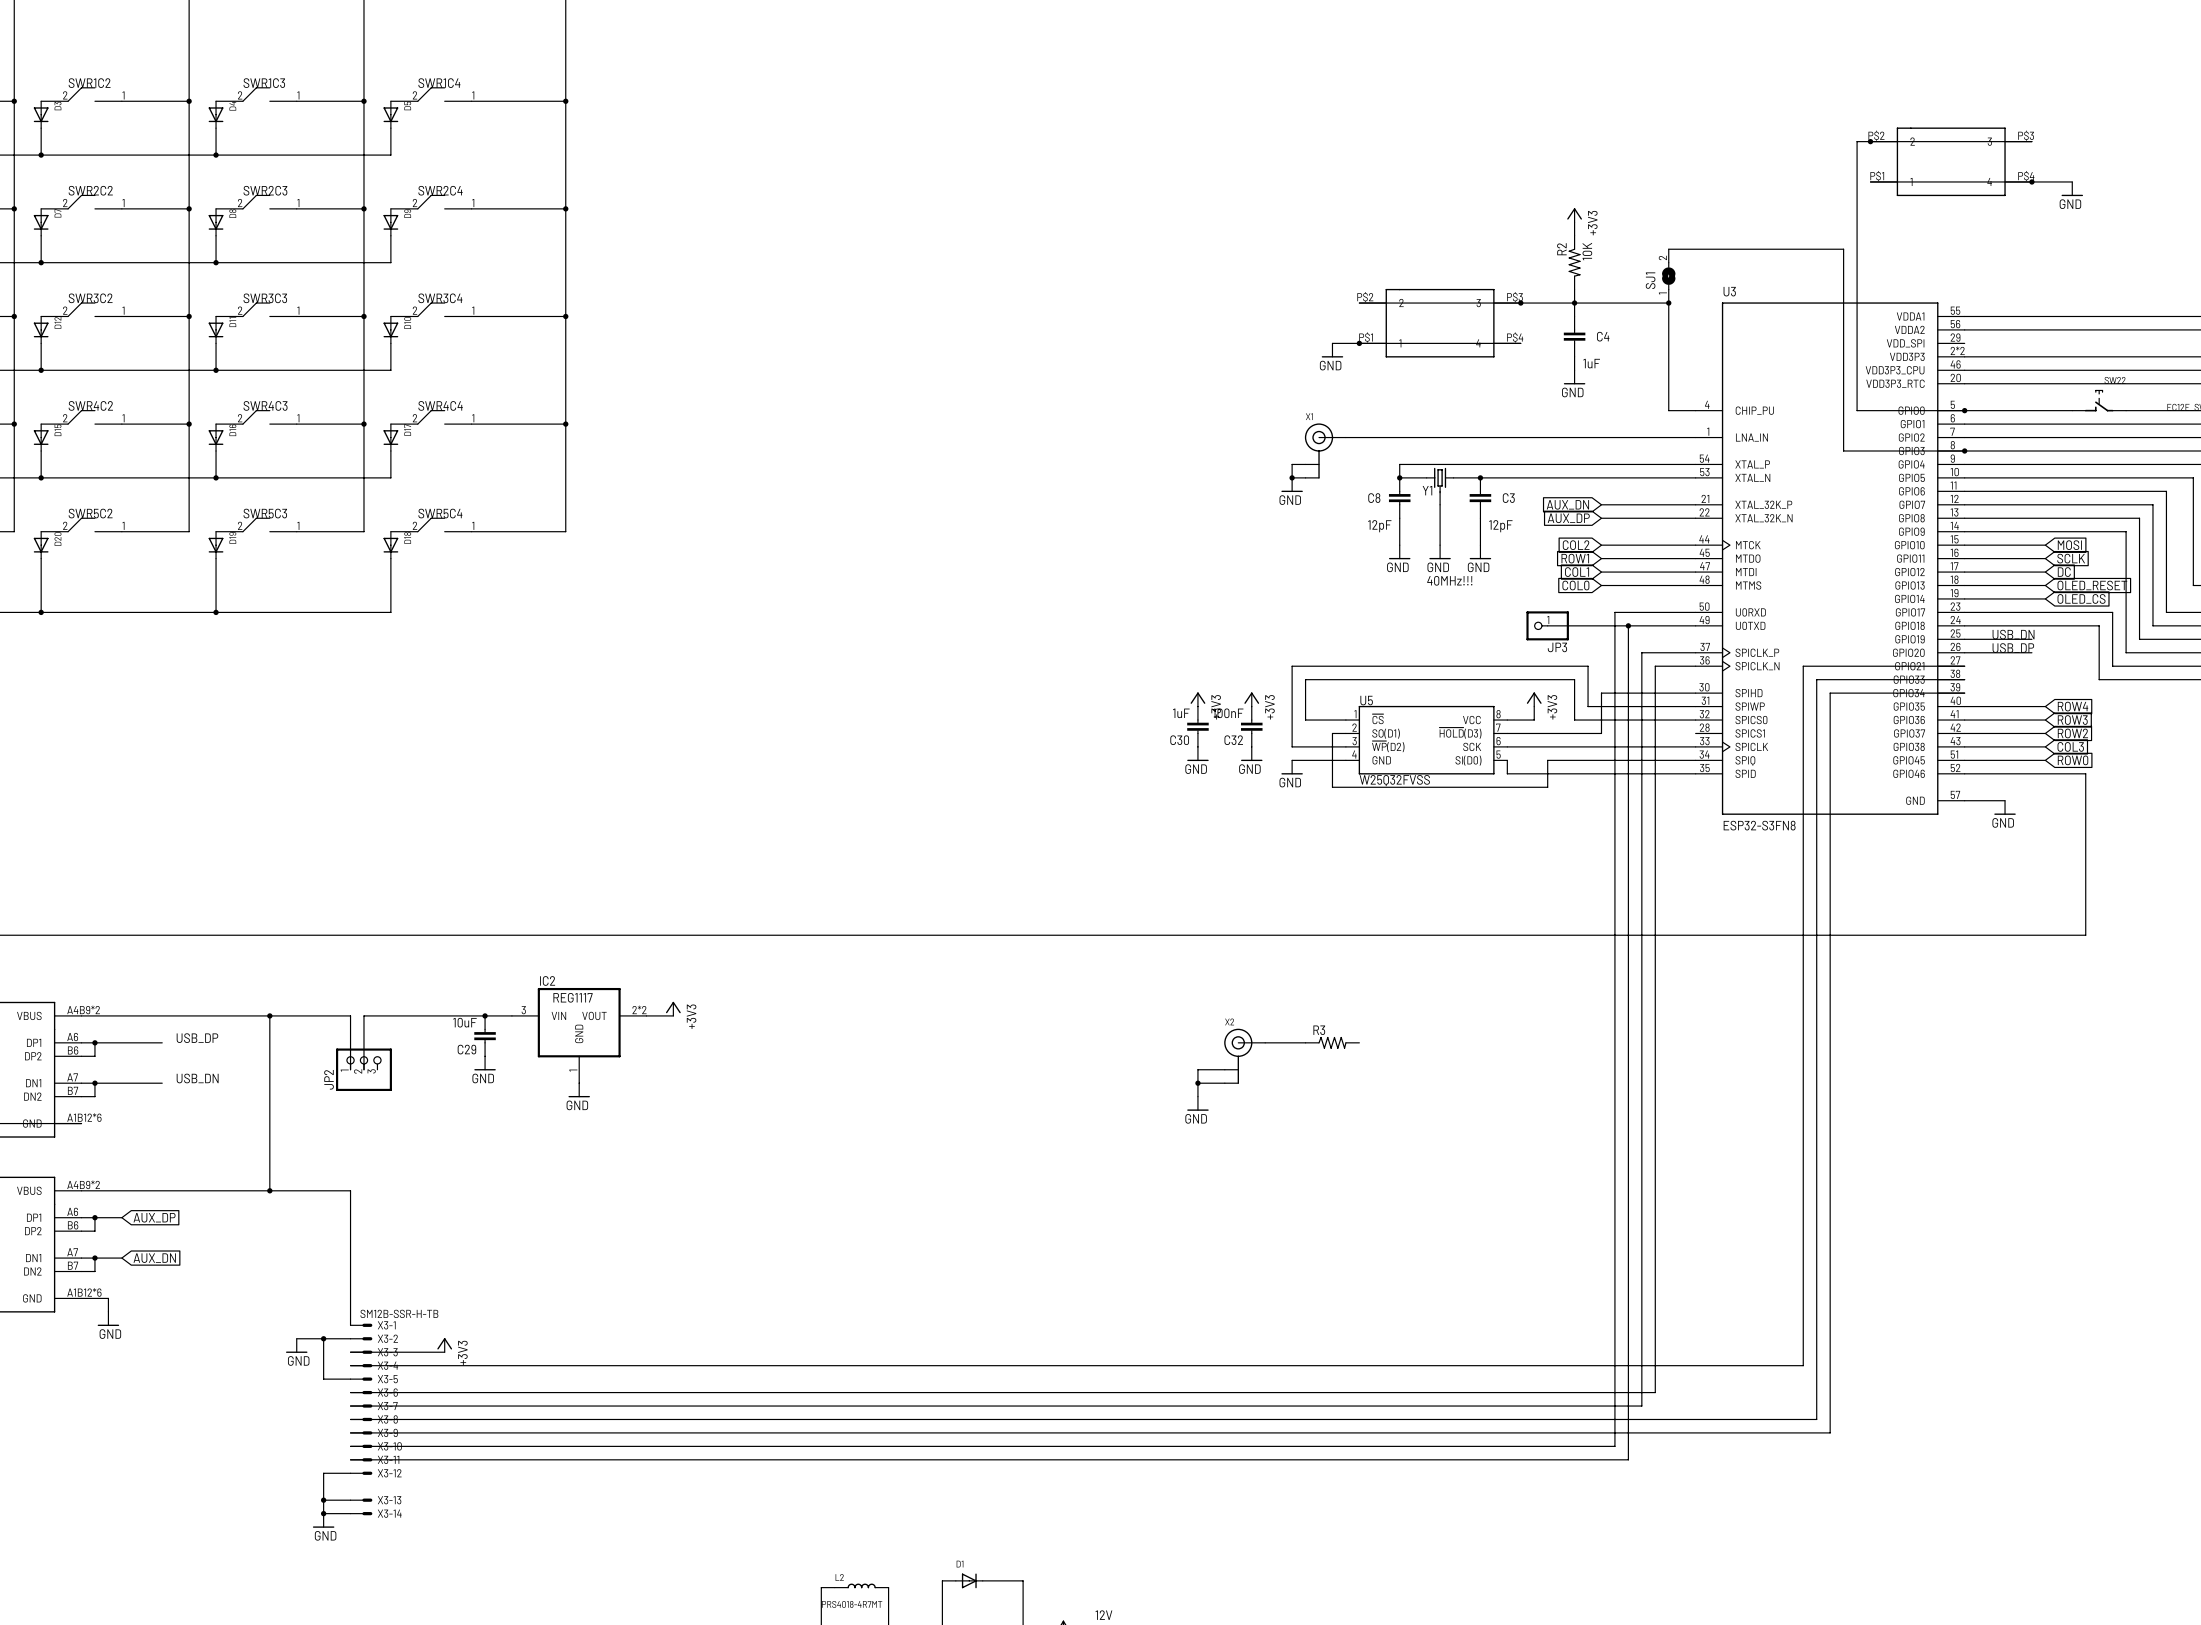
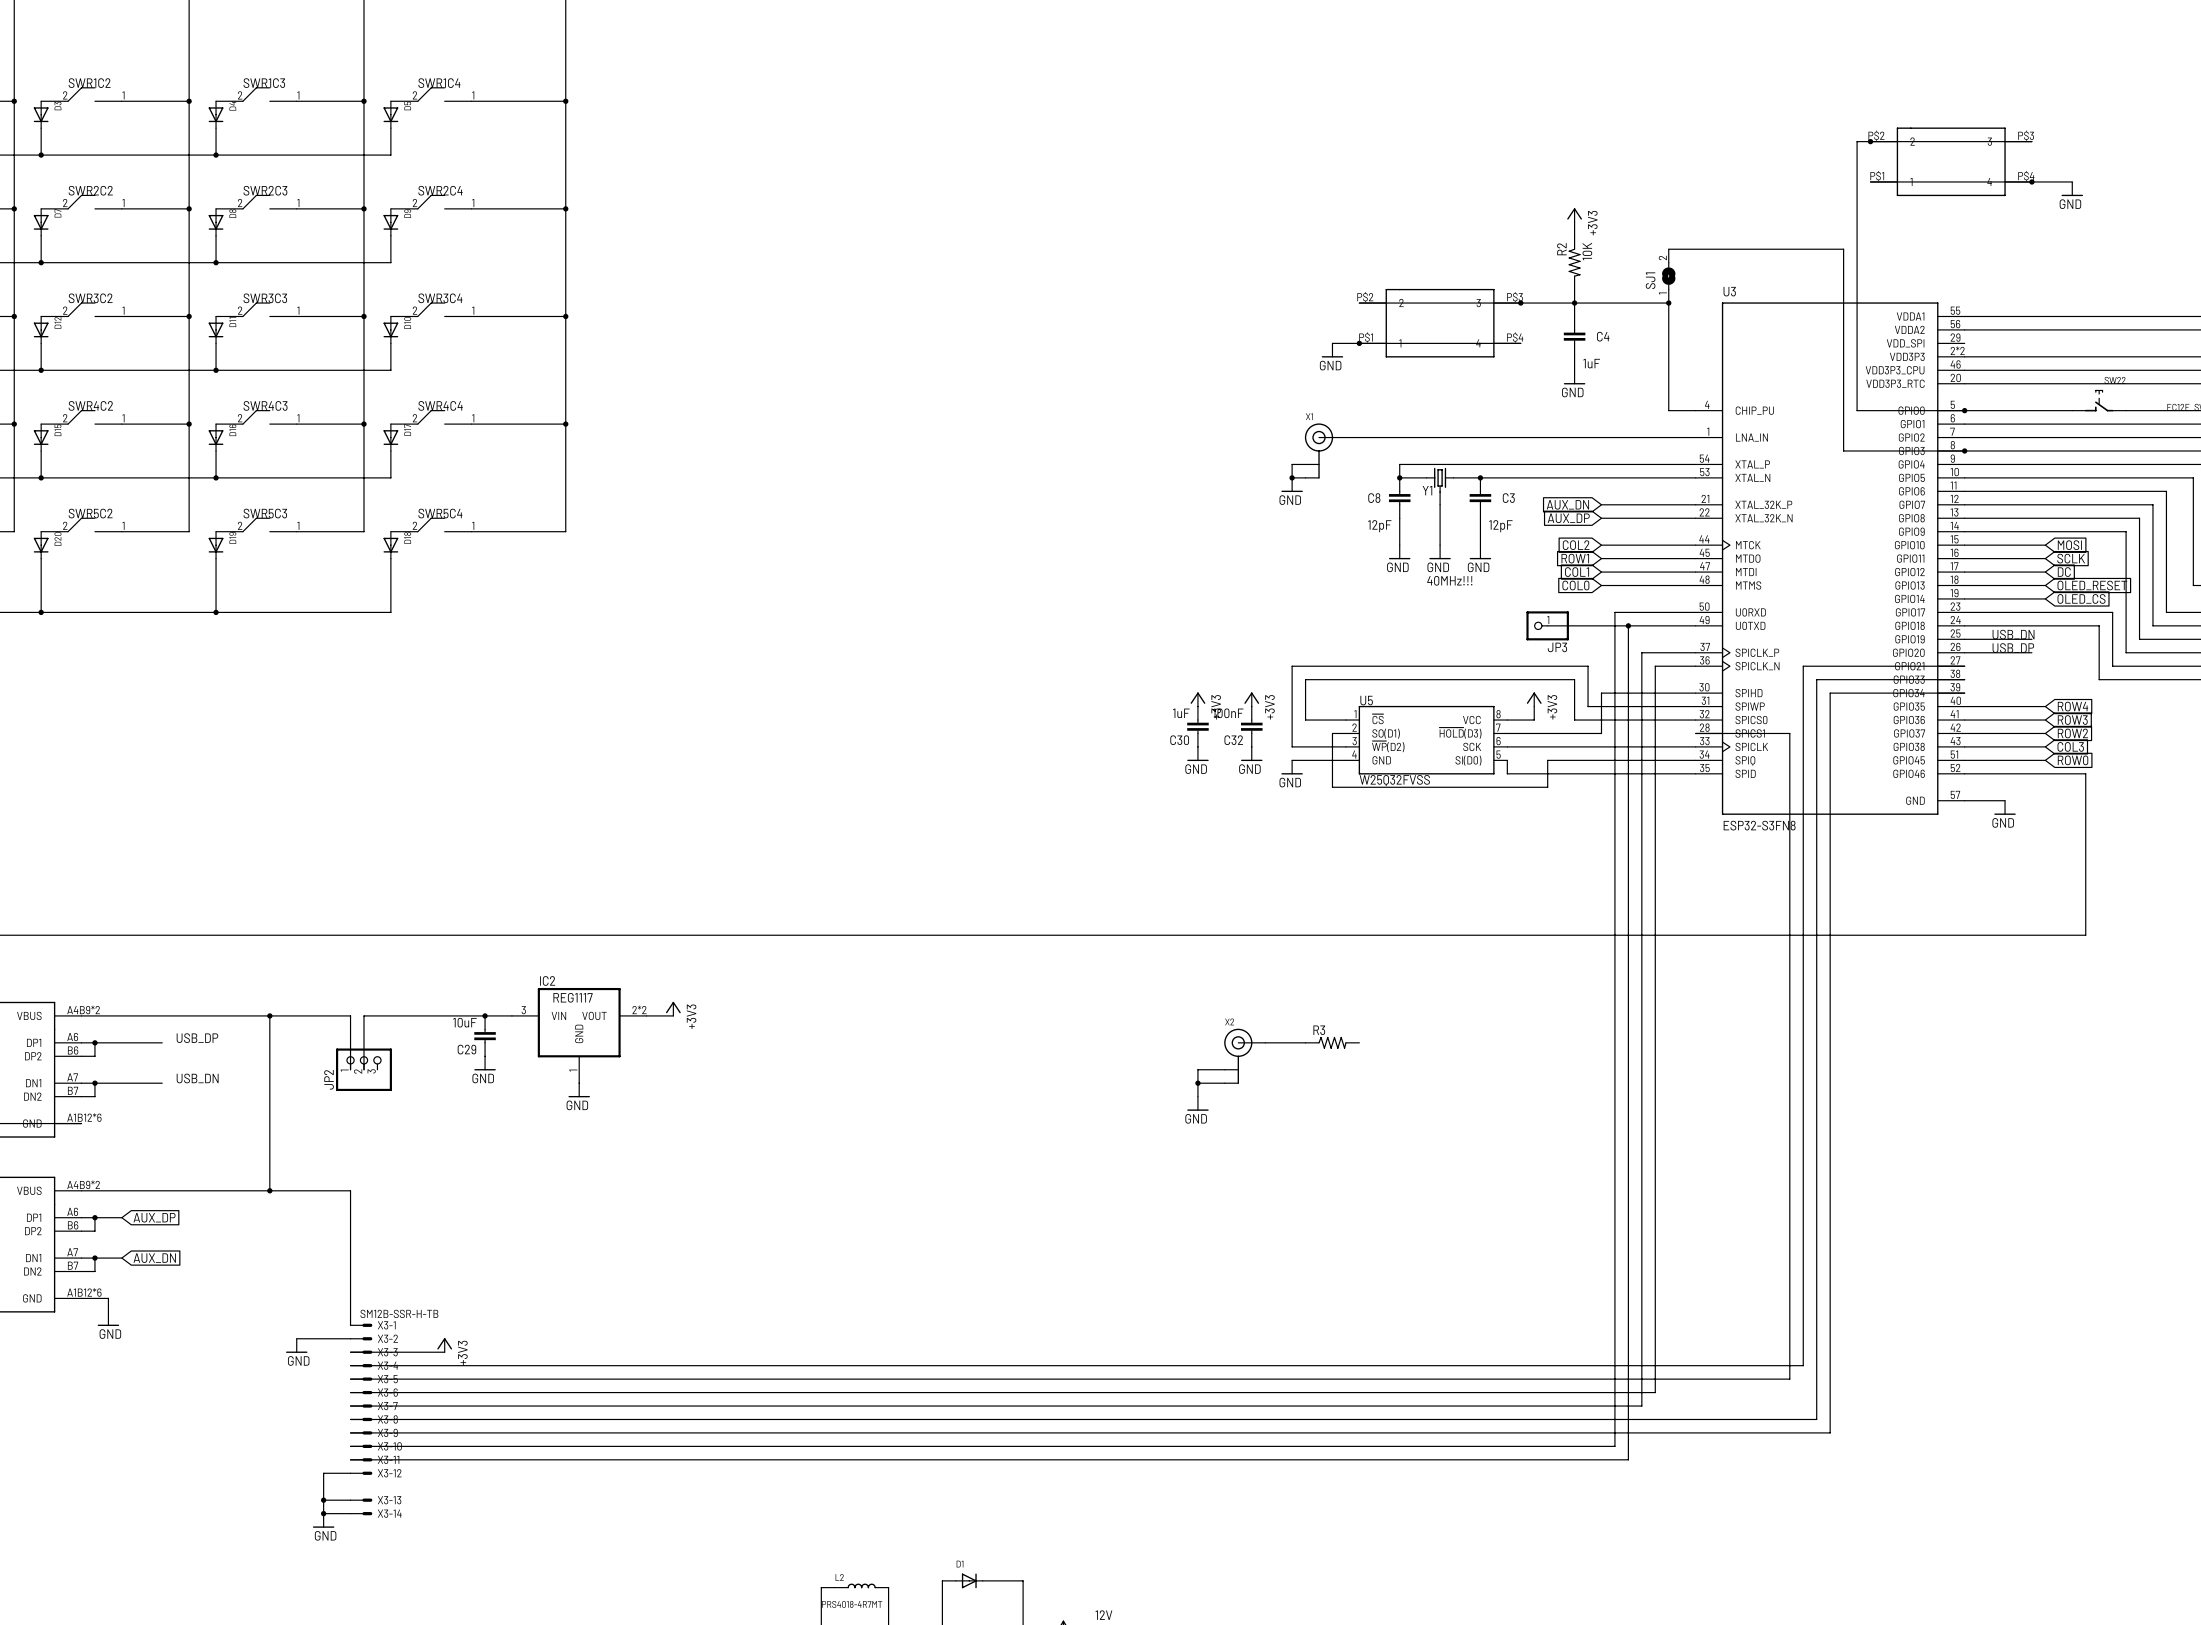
wire: (323, 1338) (323, 1379) (350, 1379) -> (1695, 733) (1789, 733) (1789, 1379) (350, 1379)
junction: (323, 1338) -> none

